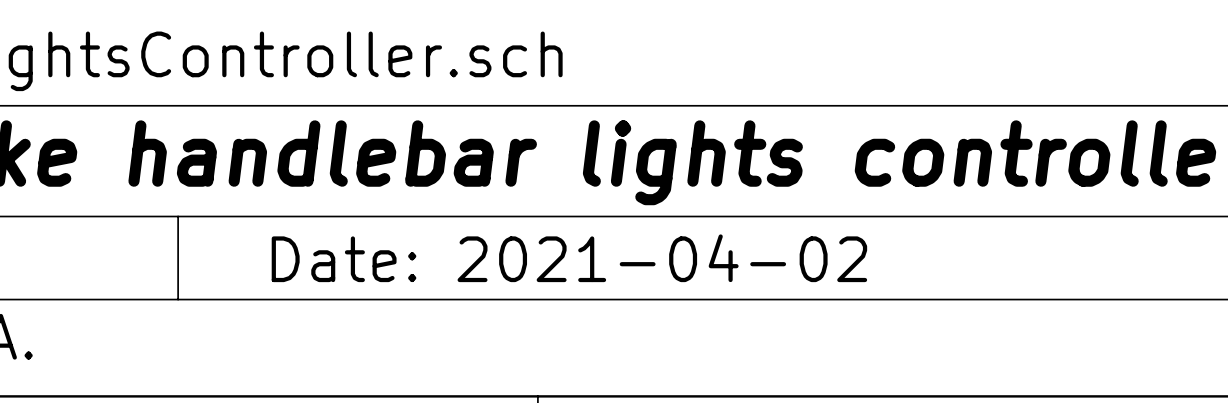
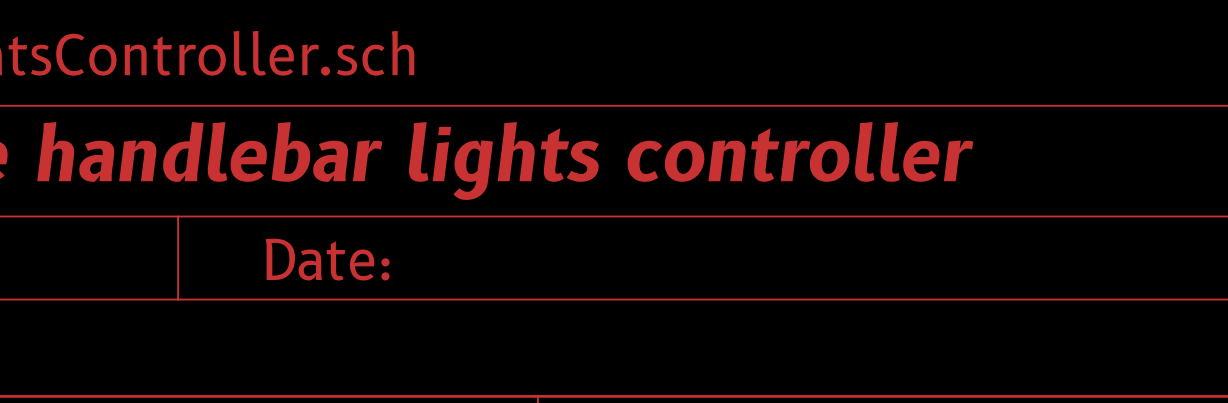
title block: Date: 2021-04-02 (569, 258) -> Date: (327, 259)

